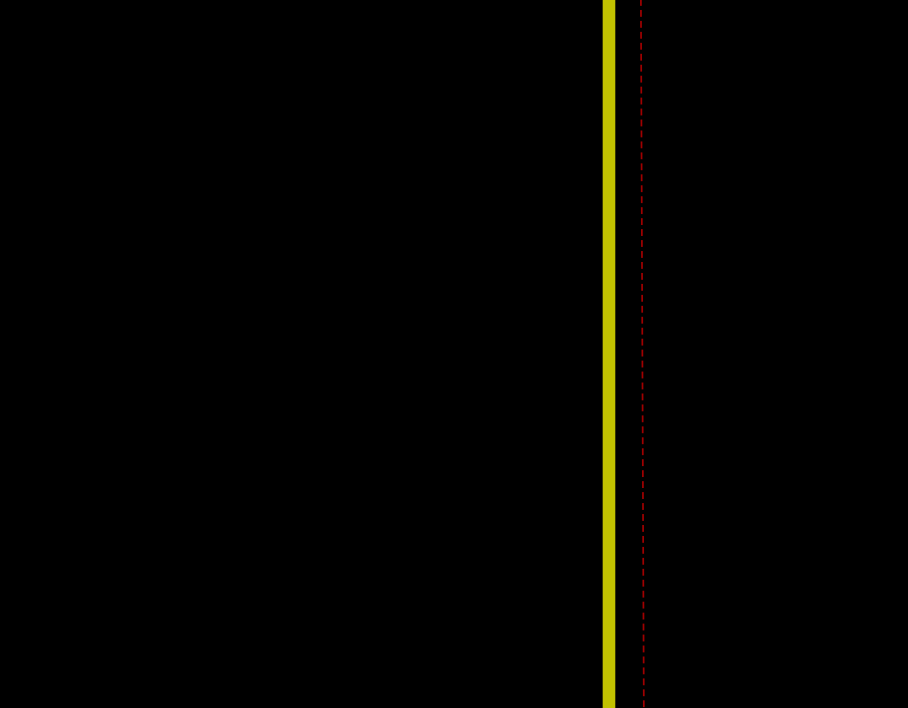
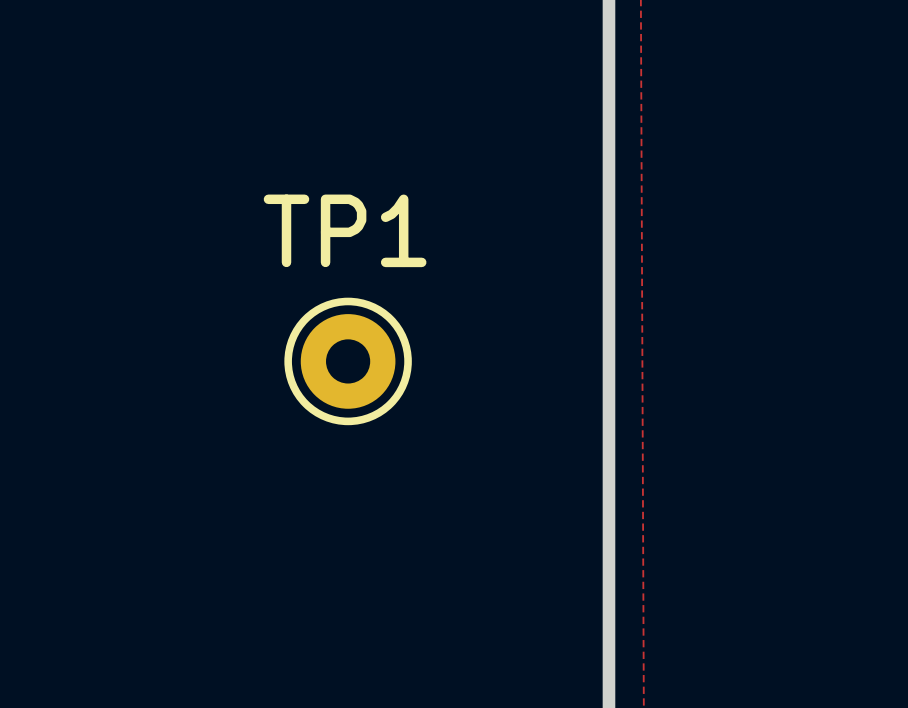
TP1: none -> (348, 361)

